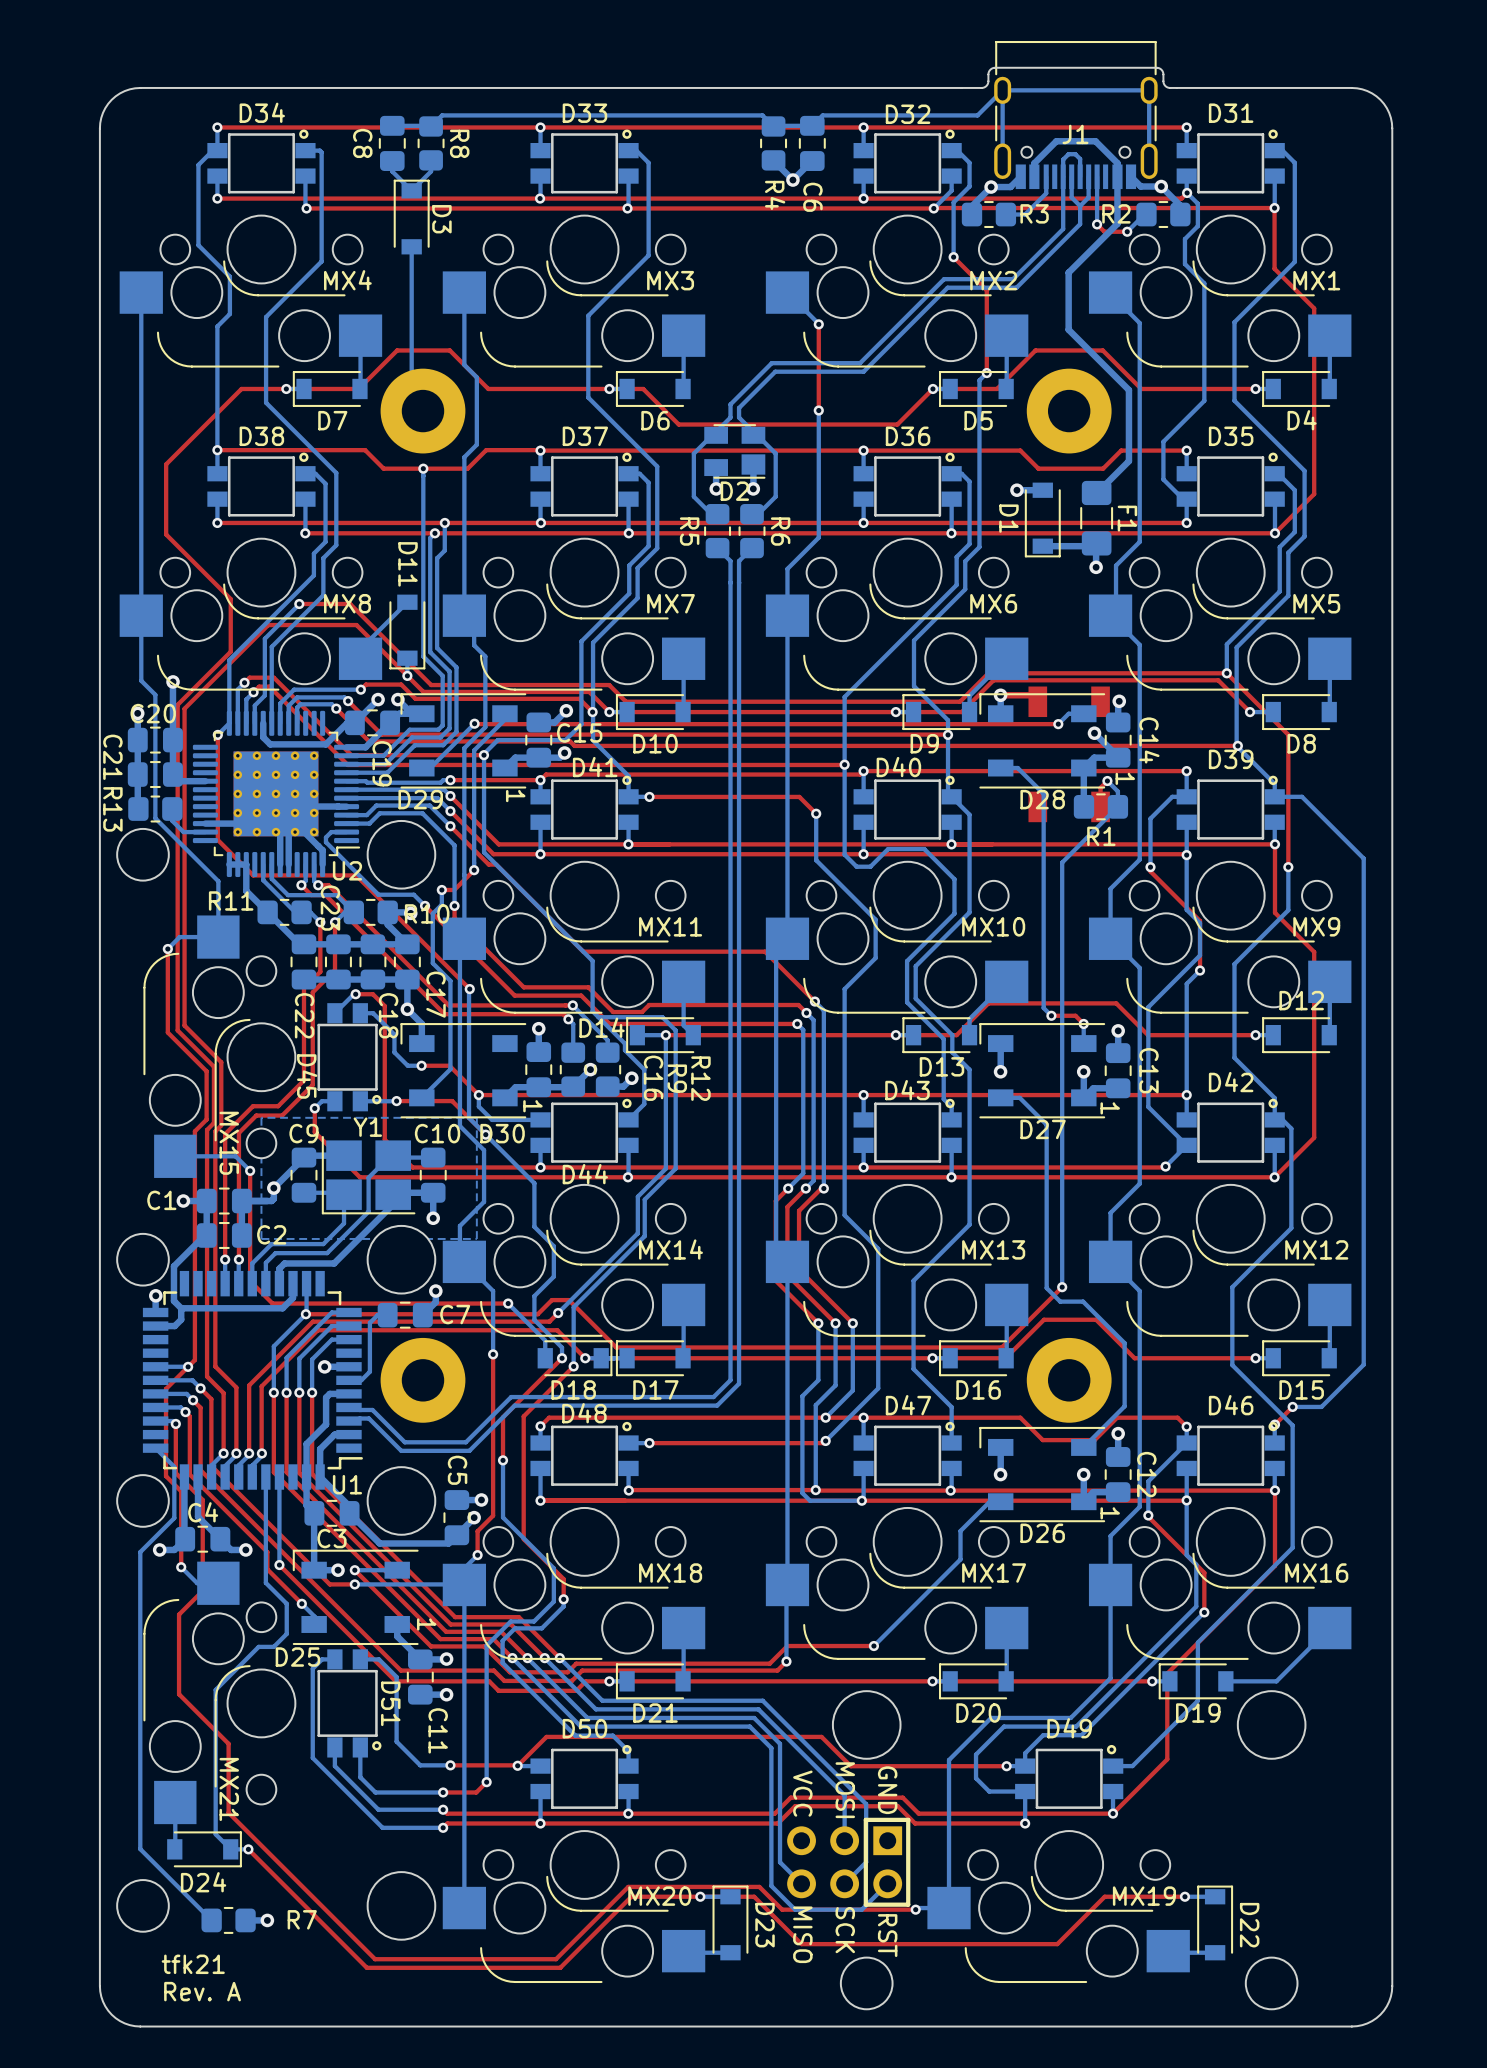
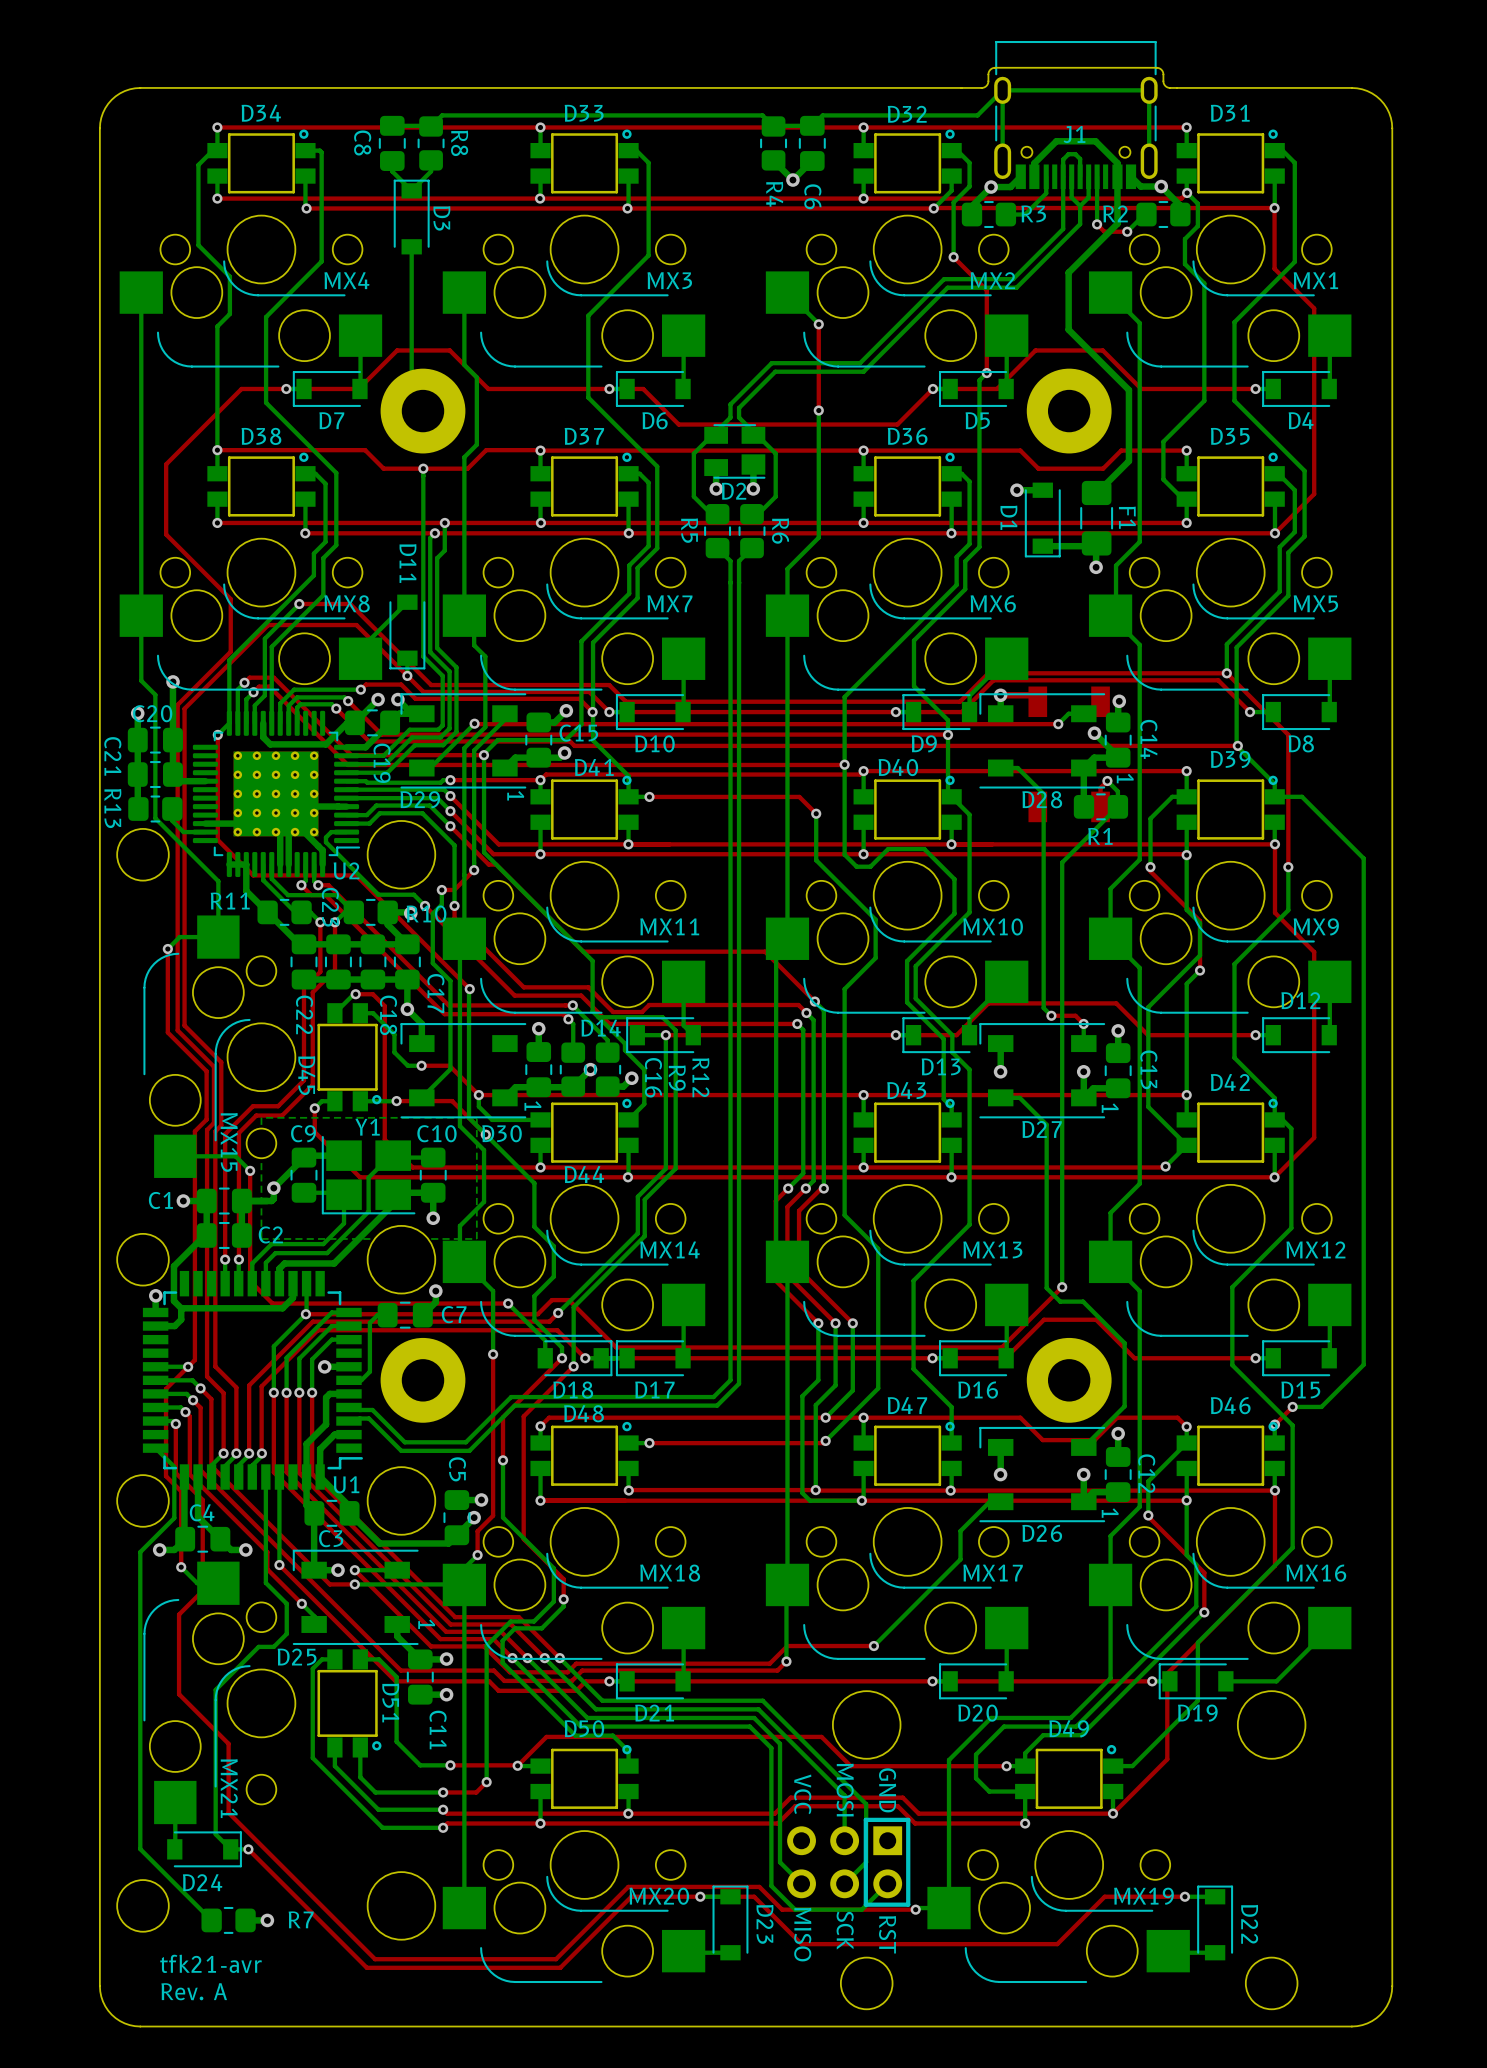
text: tfk21 (193, 1964) -> tfk21-avr (211, 1963)

